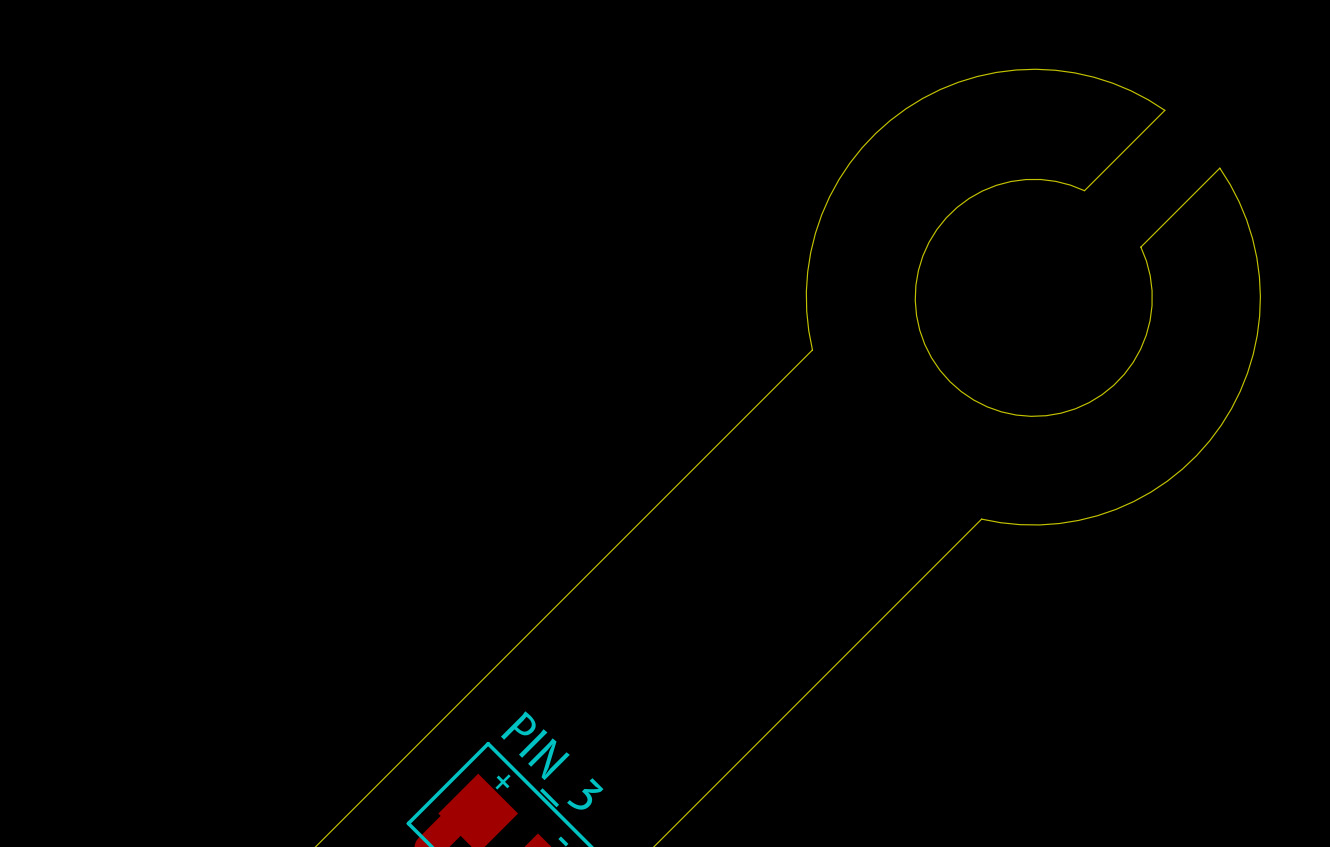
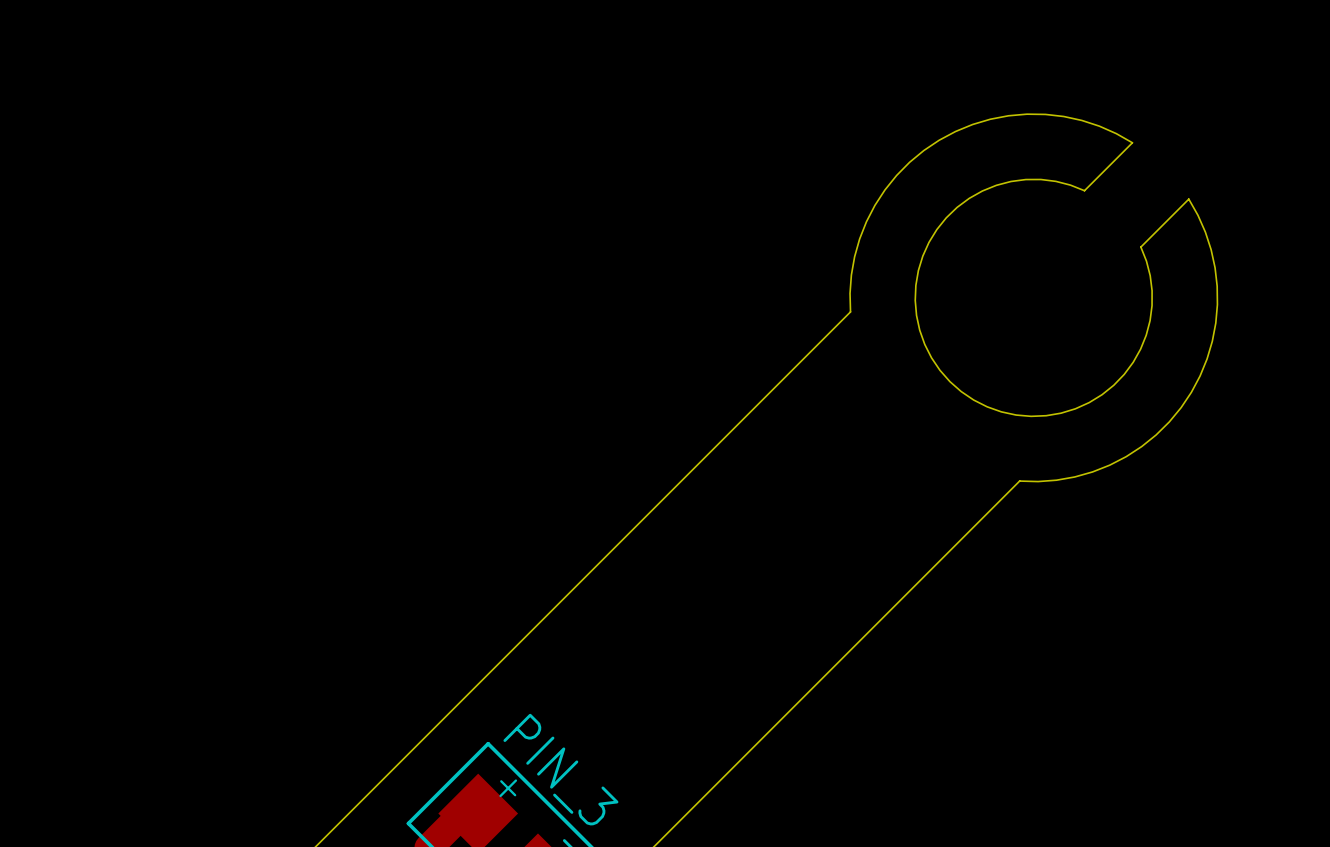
board edge: (1132, 142) (1164, 110) (1130, 90) (1112, 83) (1074, 72) (1055, 70) (1016, 69) (977, 76) (940, 89) (906, 108) (875, 133) (862, 147) (839, 179) (821, 214) (810, 252) (806, 291) (808, 330) (812, 349) -> (1132, 142) (1099, 126) (1081, 120) (1045, 114) (1008, 115) (990, 119) (972, 124) (939, 140) (909, 162) (896, 175) (874, 205) (866, 221) (854, 256) (851, 275) (850, 311) (812, 349)
board edge: (1188, 199) (1219, 168) (1239, 201) (1252, 238) (1256, 257) (1260, 296) (1259, 316) (1253, 354) (1240, 391) (1221, 425) (1209, 441) (1182, 469) (1150, 492) (1115, 509) (1097, 515) (1059, 523) (1020, 524) (981, 519) -> (1188, 199) (1205, 232) (1211, 249) (1217, 286) (1215, 323) (1212, 341) (1207, 358) (1191, 392) (1169, 421) (1156, 434) (1126, 456) (1109, 465) (1074, 476) (1056, 480) (1019, 481) (981, 519)

